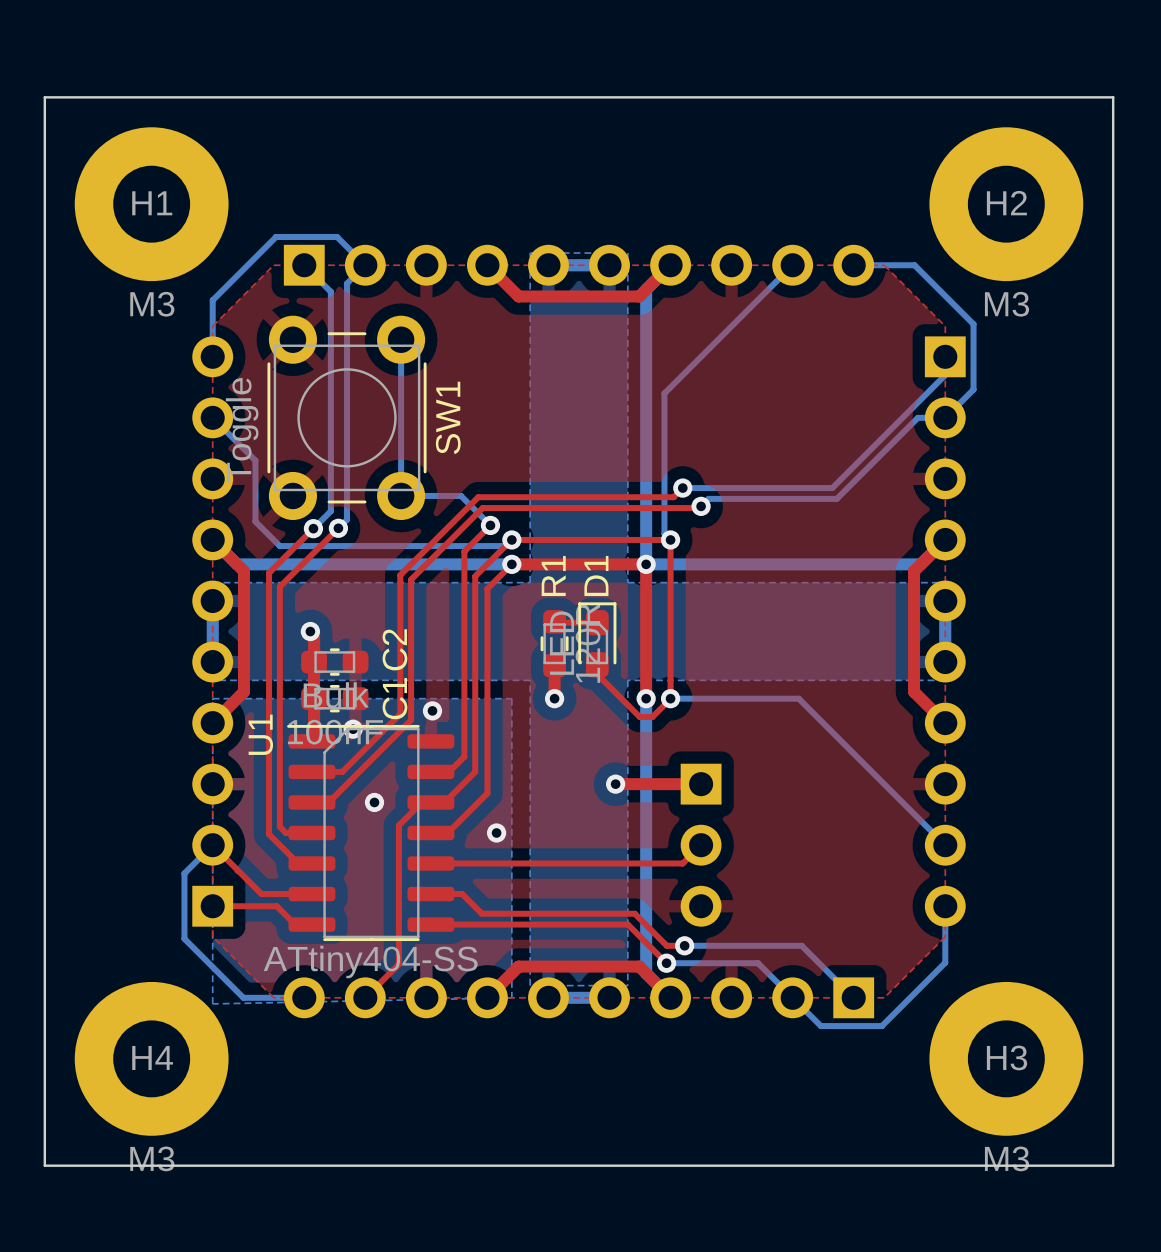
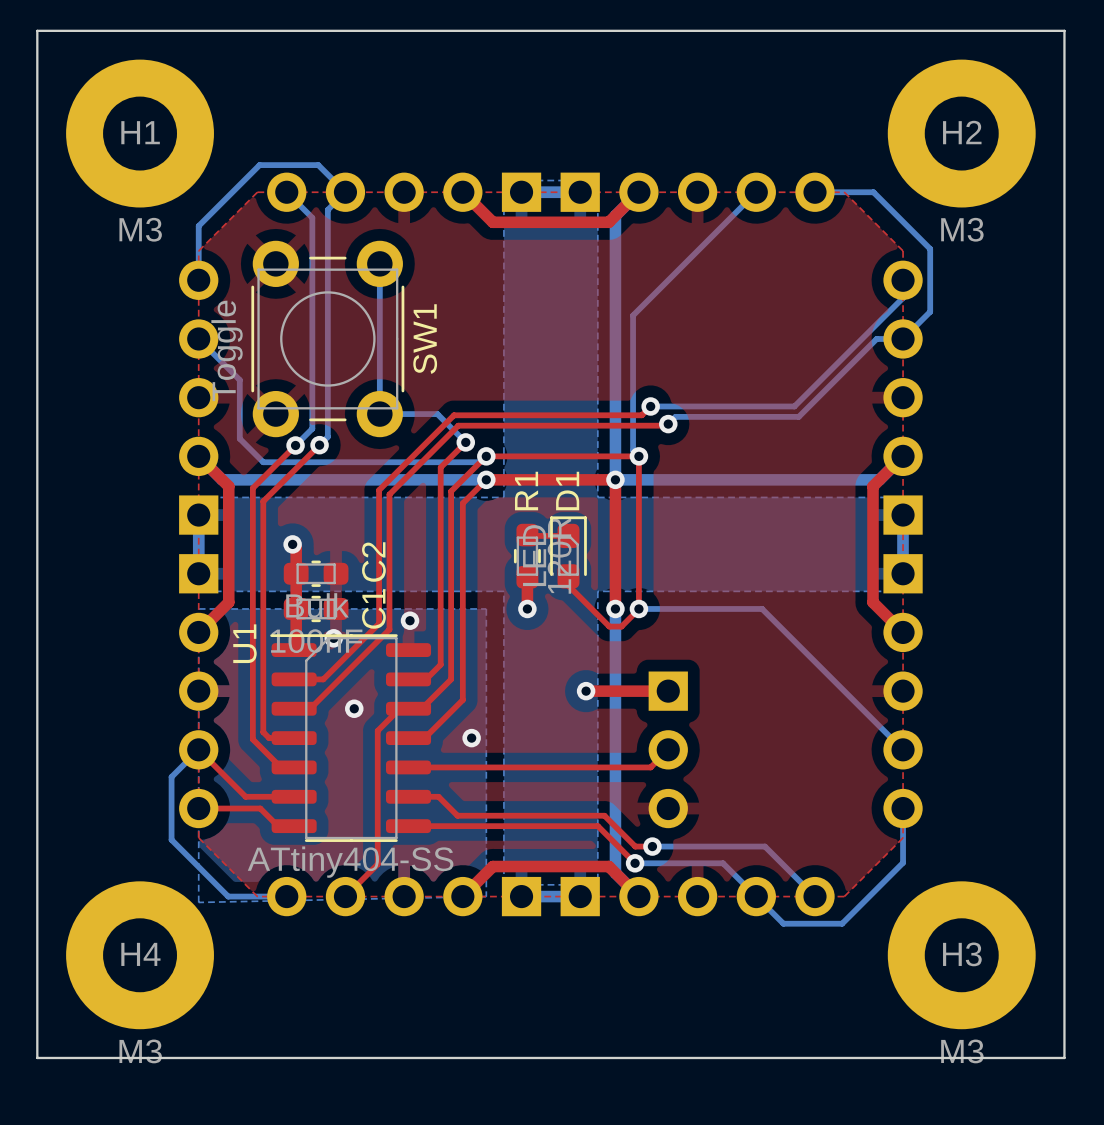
part: none -> (404, 192)
part: (579, 265) -> none
part: none -> (697, 192)
part: none -> (198, 397)
part: none -> (903, 397)
part: (212, 631) -> none
part: (945, 631) -> none
part: none -> (198, 691)
part: none -> (903, 691)
part: none -> (404, 896)
part: (579, 997) -> none
part: none -> (697, 896)

